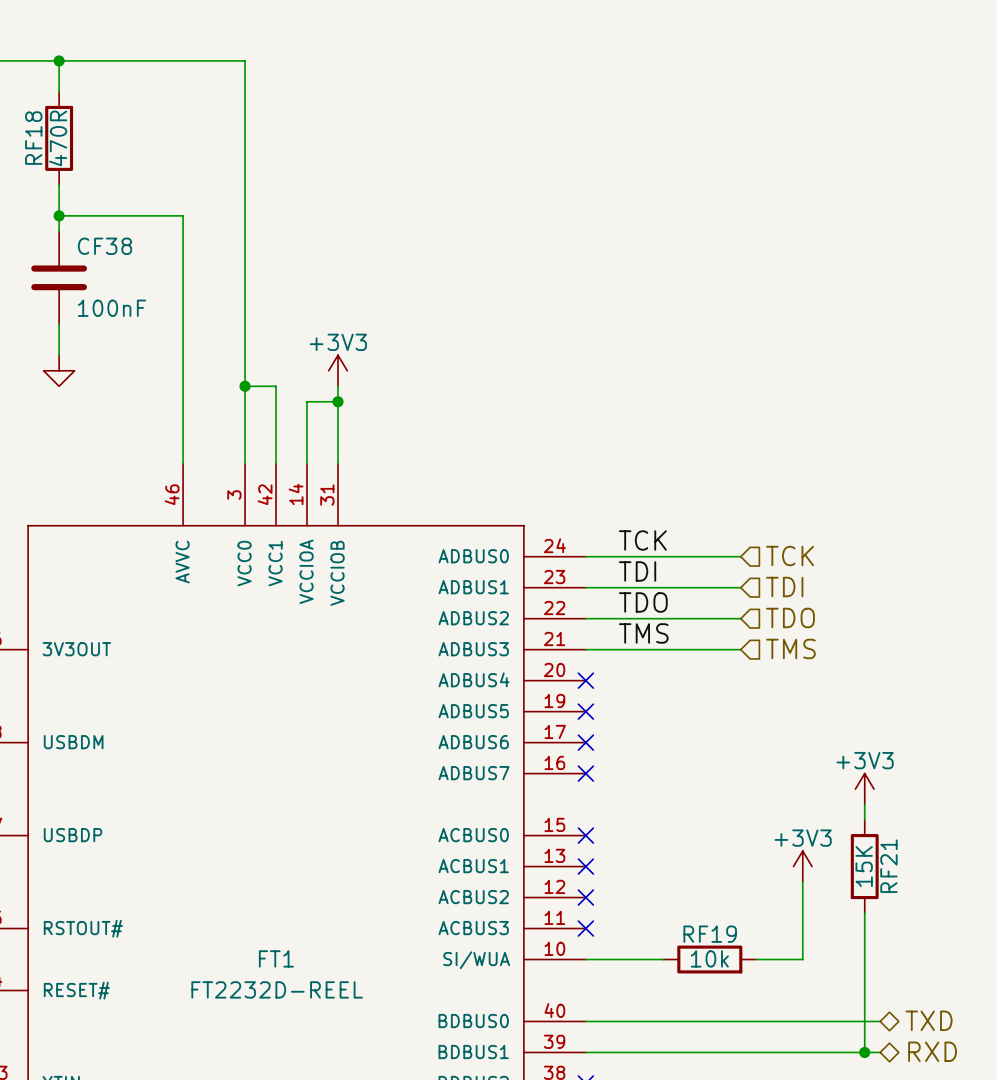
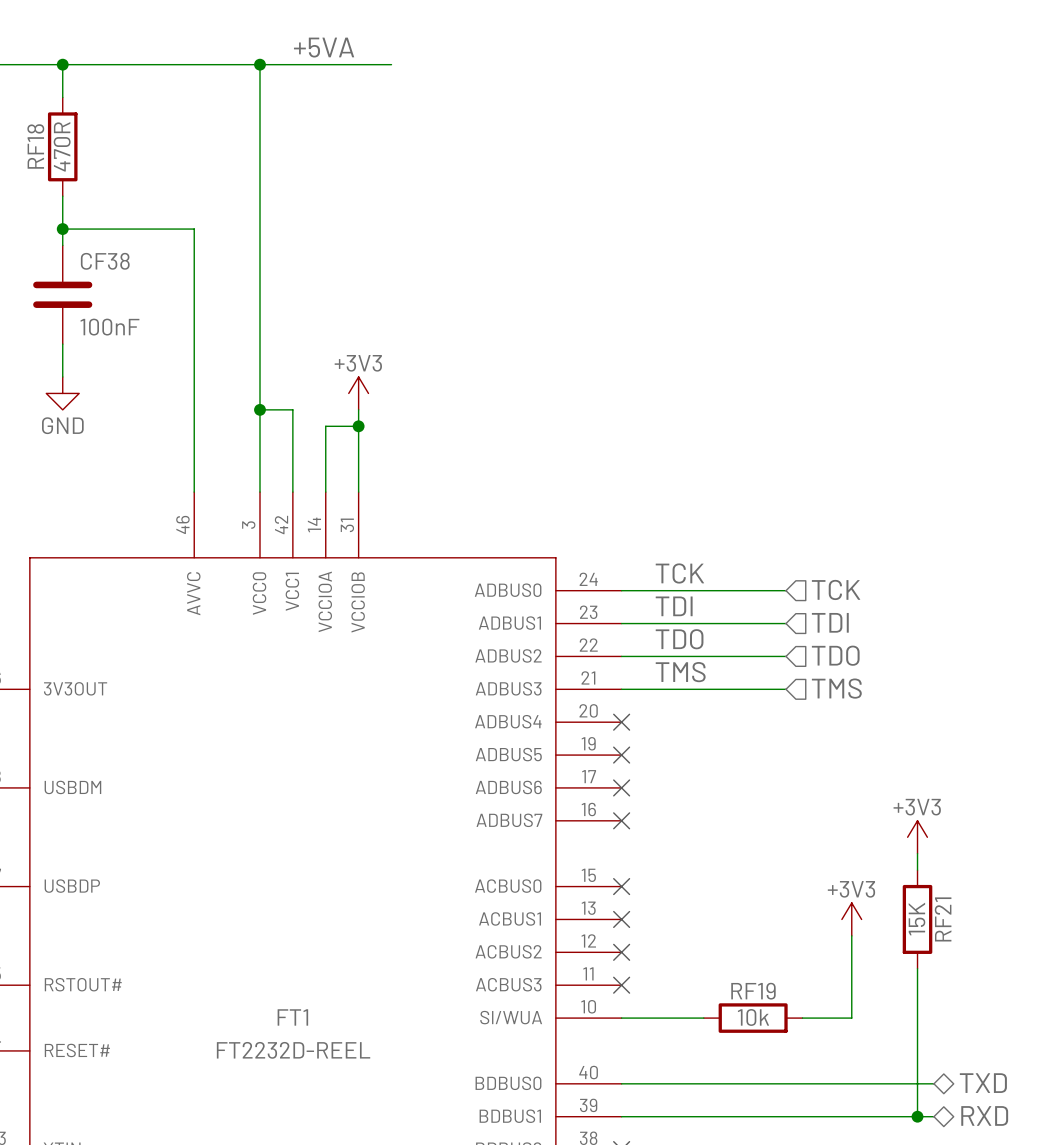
label: none -> +5VA (324, 47)
wire: none -> (259, 64) (391, 64)
junction: none -> (259, 64)
power symbol text: none -> GND (62, 425)

